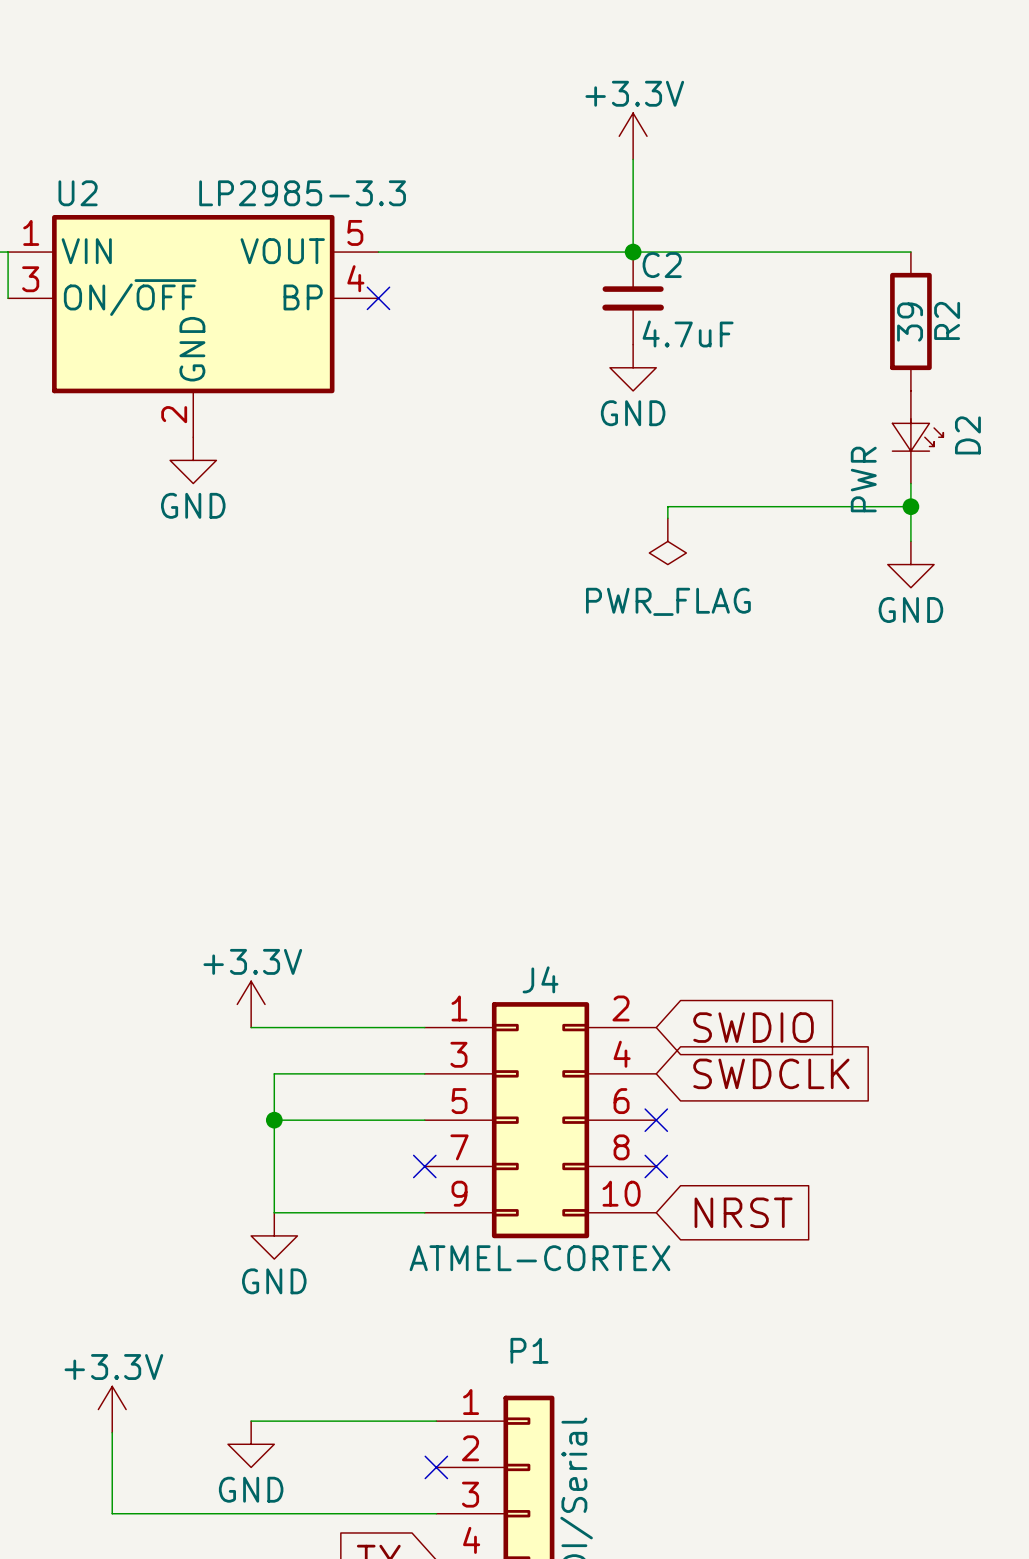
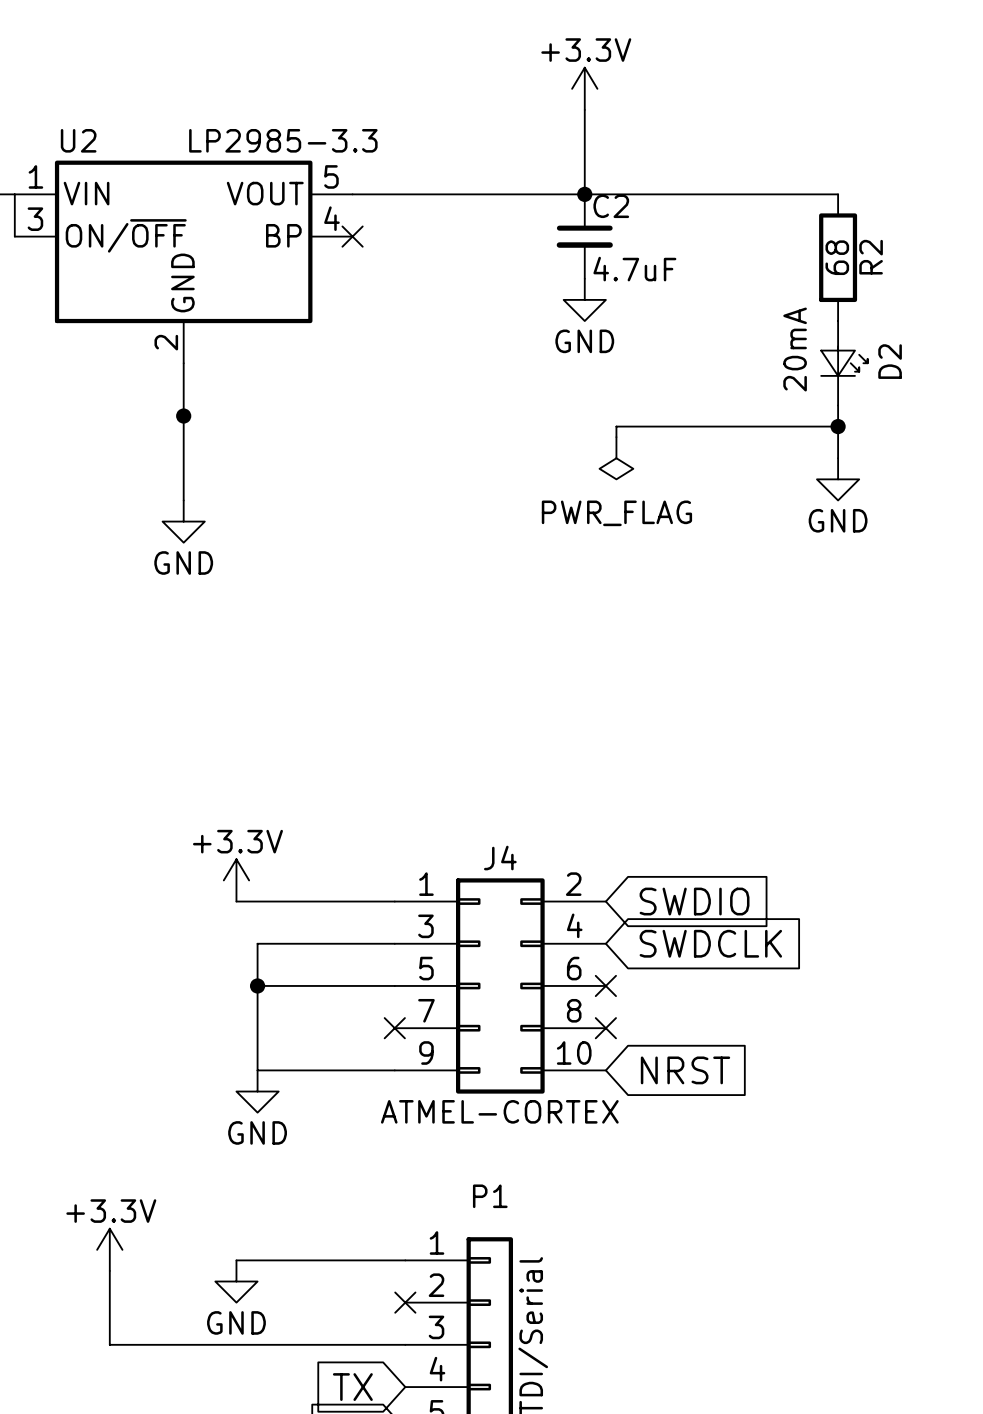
R2 value: 39 (910, 322) -> 68 (837, 257)
wire: none -> (183, 363) (183, 500)
power symbol position: GND (193, 460) -> GND (183, 521)
D2 value: PWR (863, 479) -> 20mA (795, 349)
junction: none -> (183, 416)

